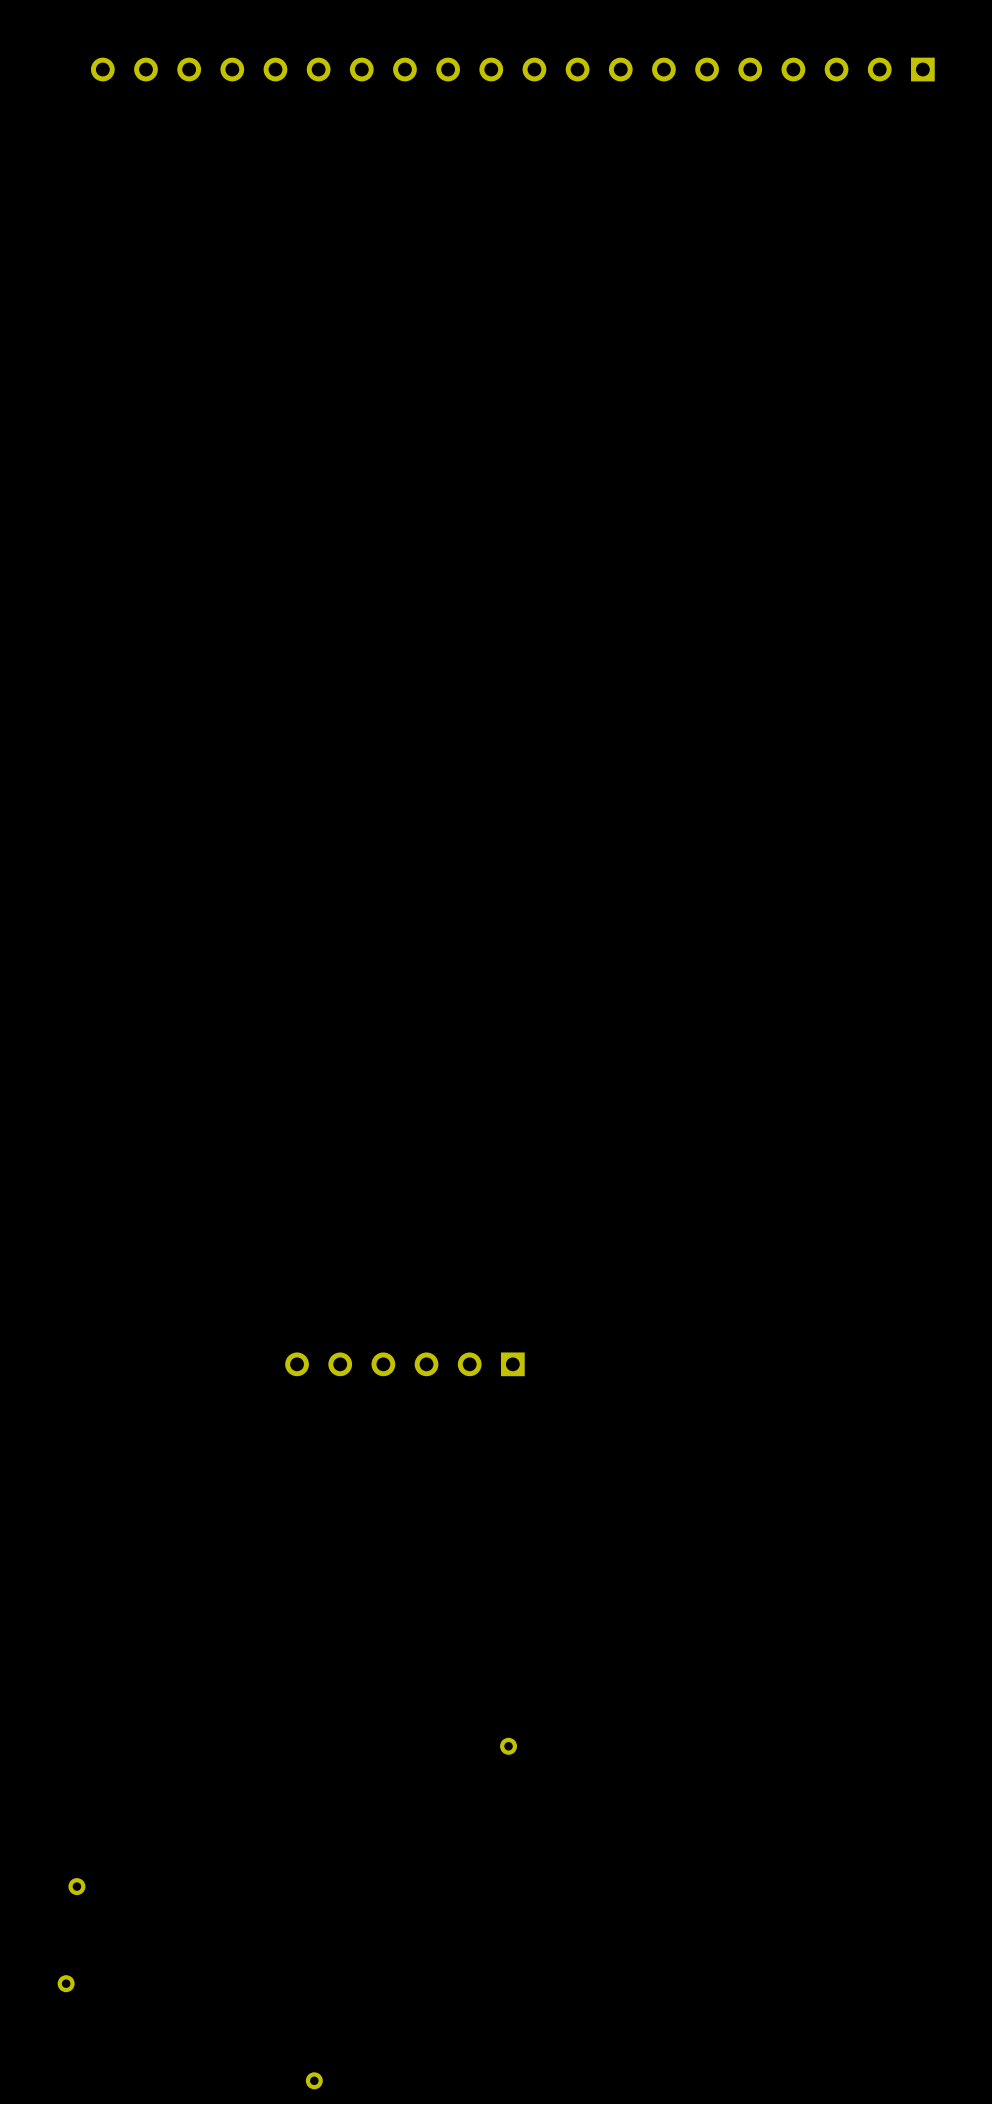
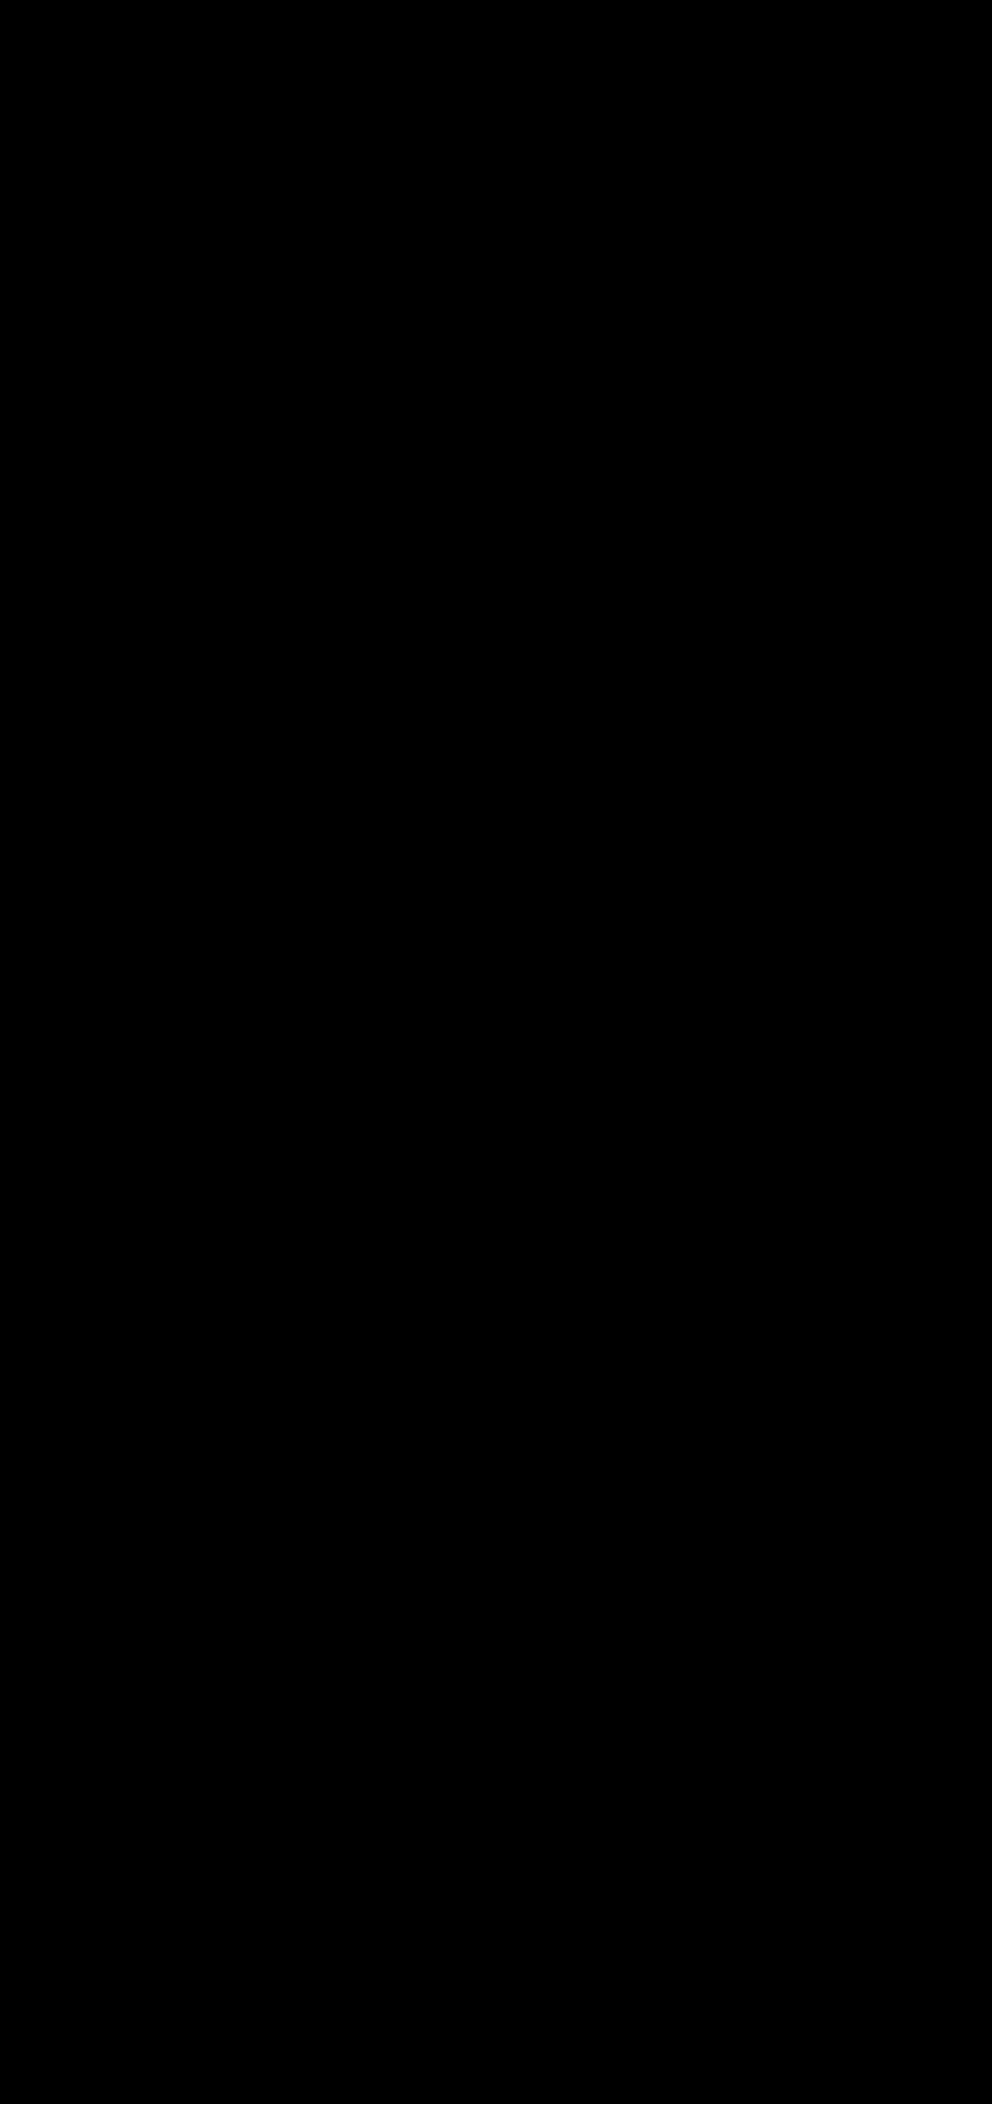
part: (512, 69) -> none
part: (404, 1364) -> none
part: (508, 1746) -> none
part: (76, 1886) -> none
part: (66, 1983) -> none
part: (314, 2080) -> none

